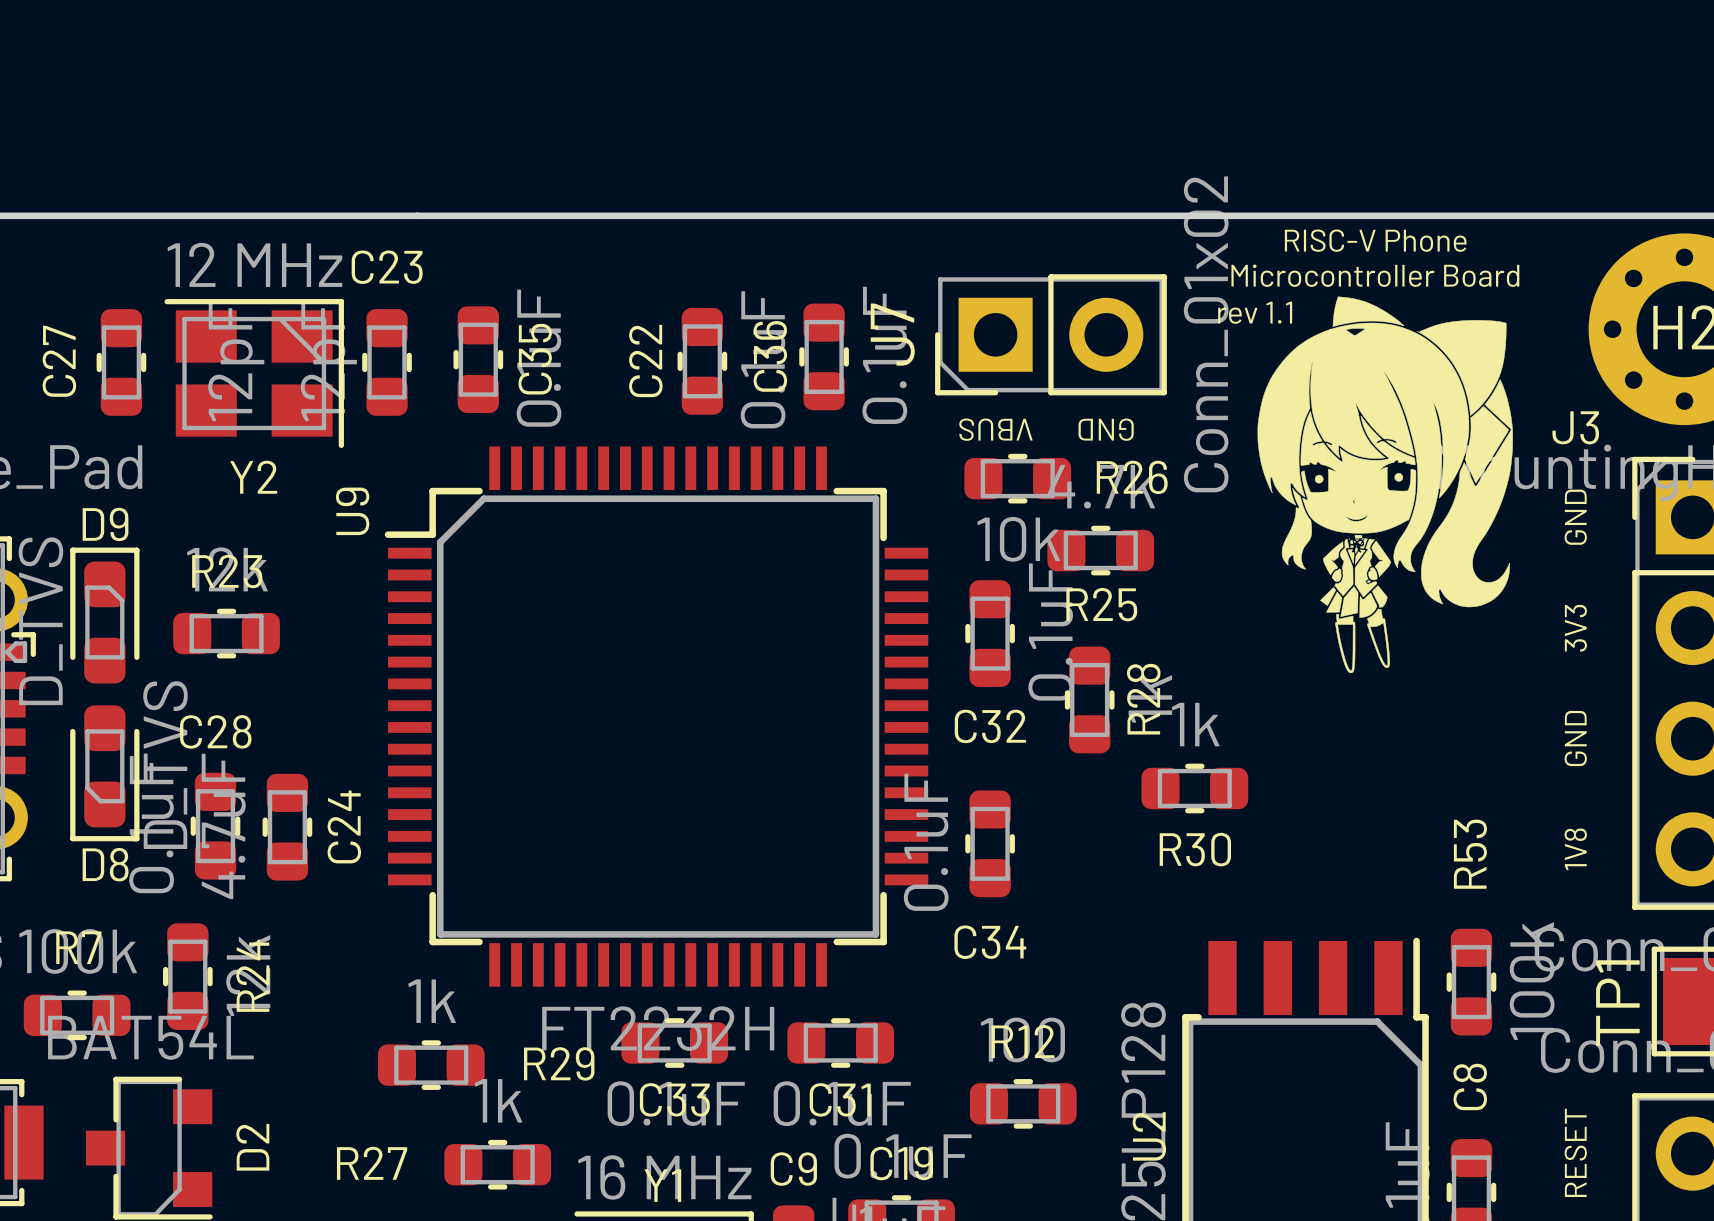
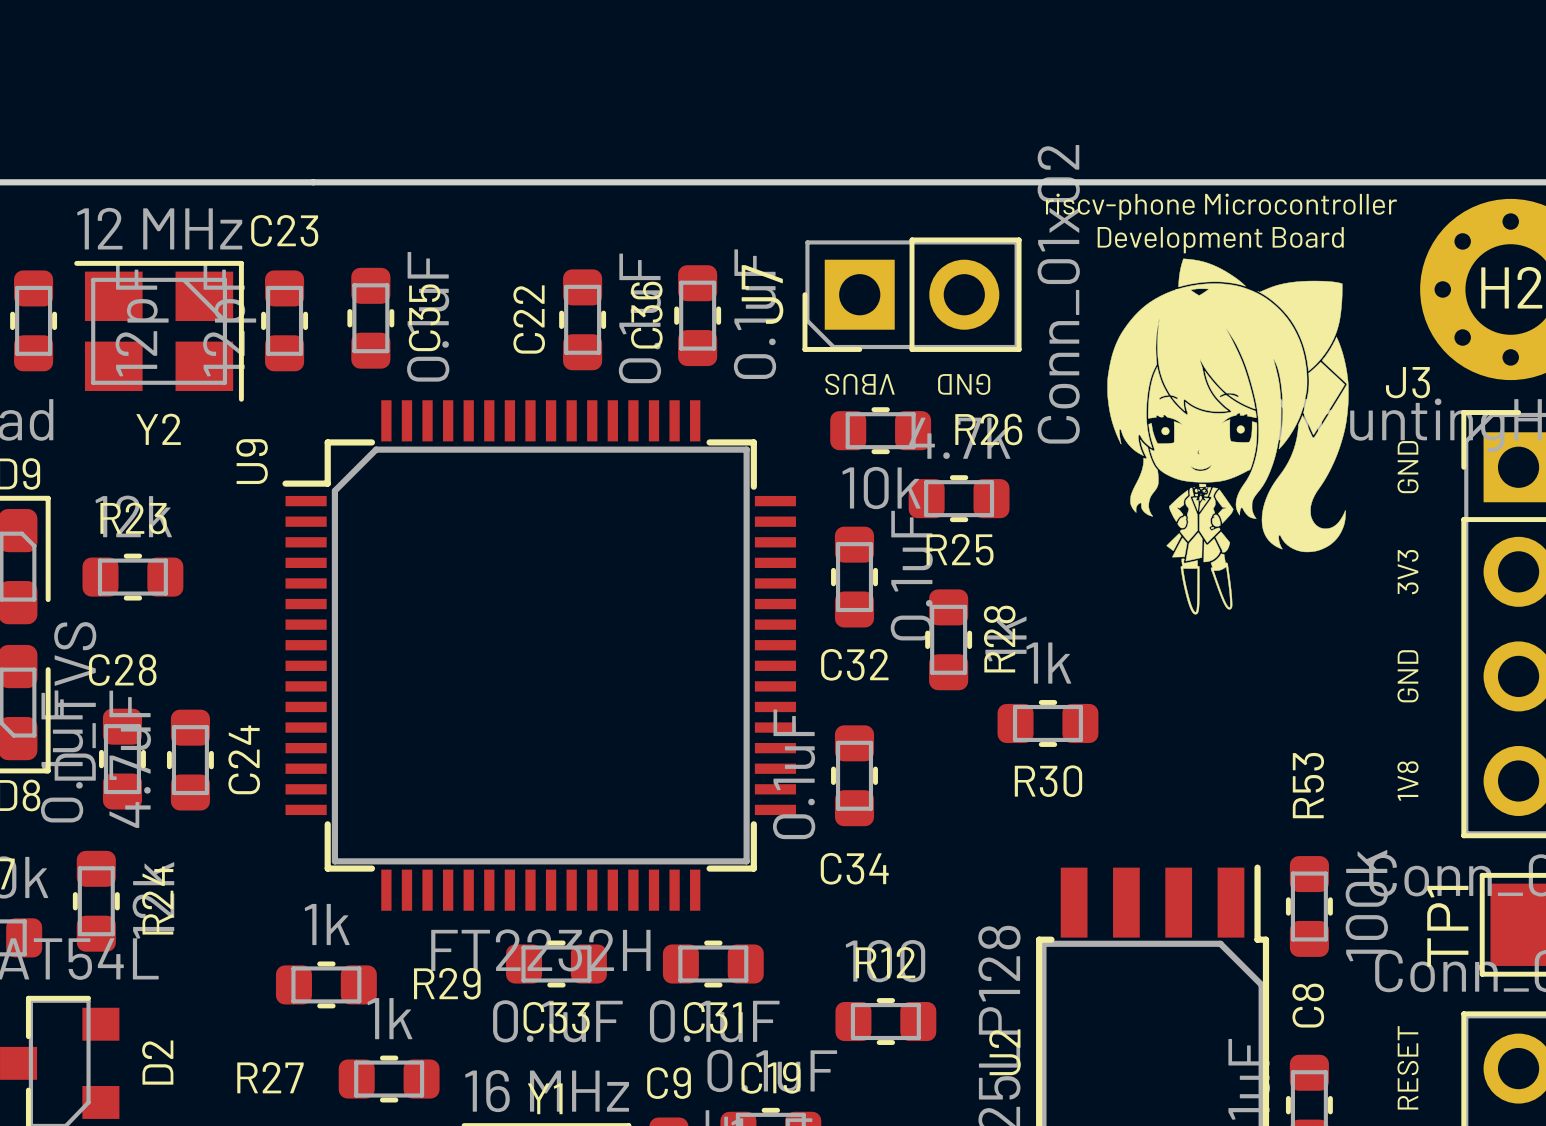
text: RISC-V Phone (1375, 240) -> riscv-phone Microcontroller (1221, 206)
text: Microcontroller Board (1375, 275) -> Development Board (1220, 240)
text: rev 1.1 (1255, 312) -> none

